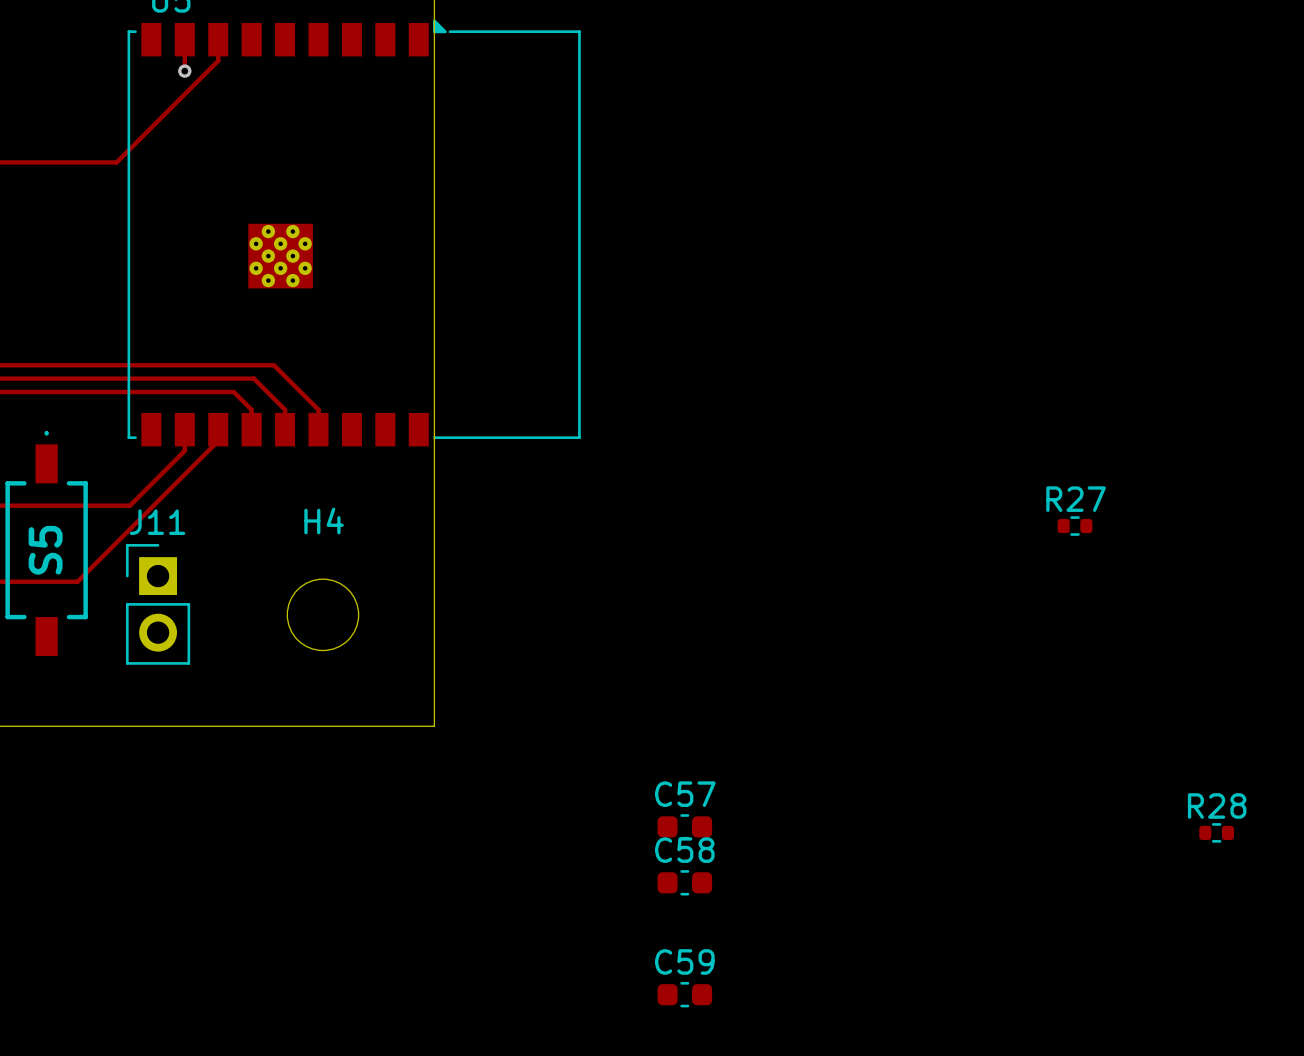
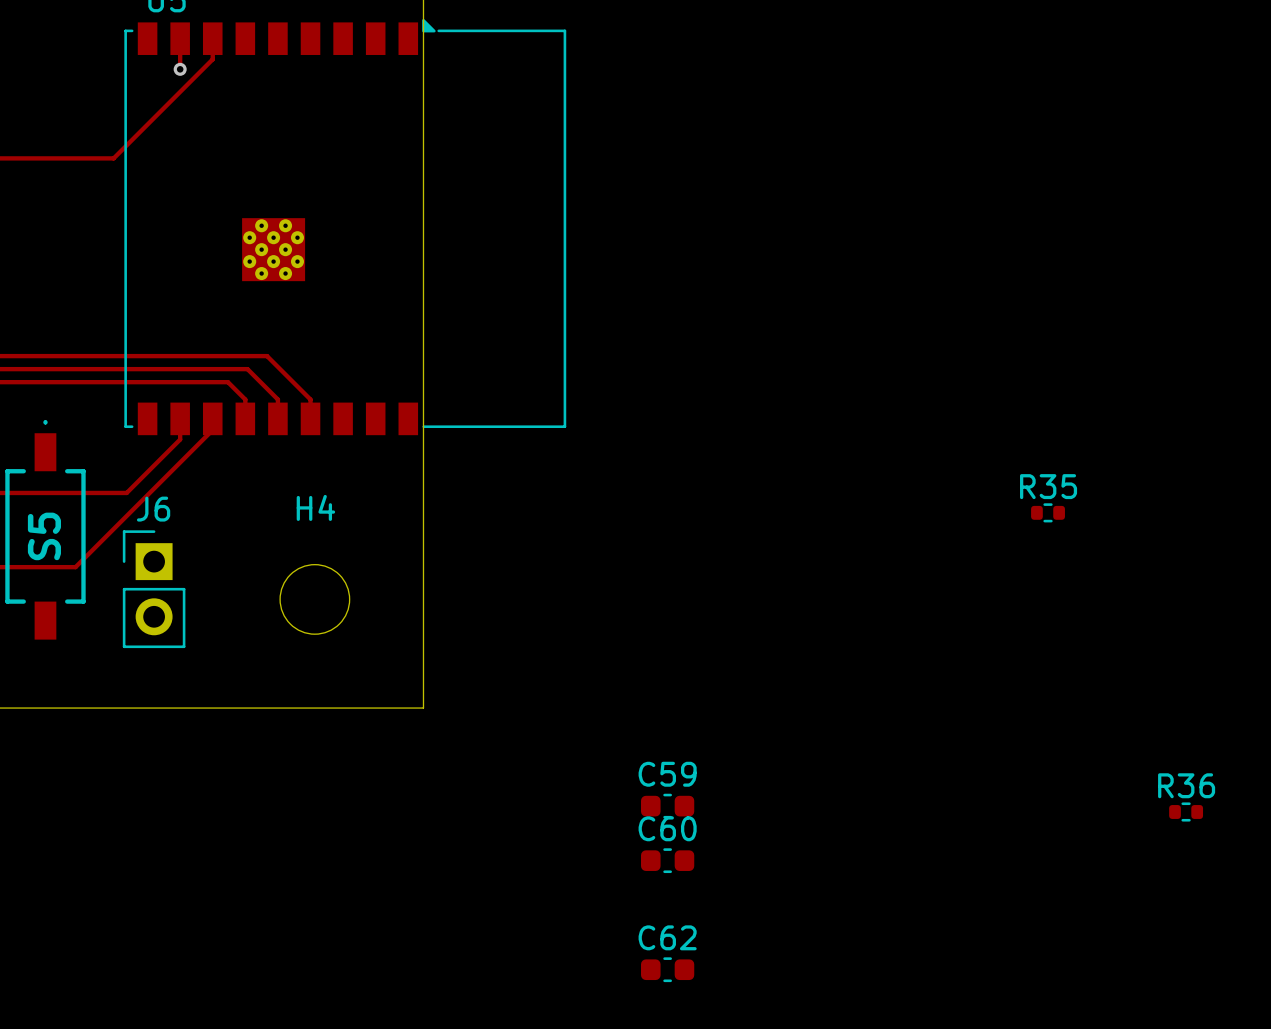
R27 name: R27 (1076, 499) -> R35 (1048, 486)
J11 name: J11 (157, 522) -> J6 (153, 509)
C57 name: C57 (685, 794) -> C59 (667, 774)
R28 name: R28 (1217, 805) -> R36 (1186, 785)
C58 name: C58 (684, 850) -> C60 (667, 828)
C59 name: C59 (684, 961) -> C62 (667, 937)

